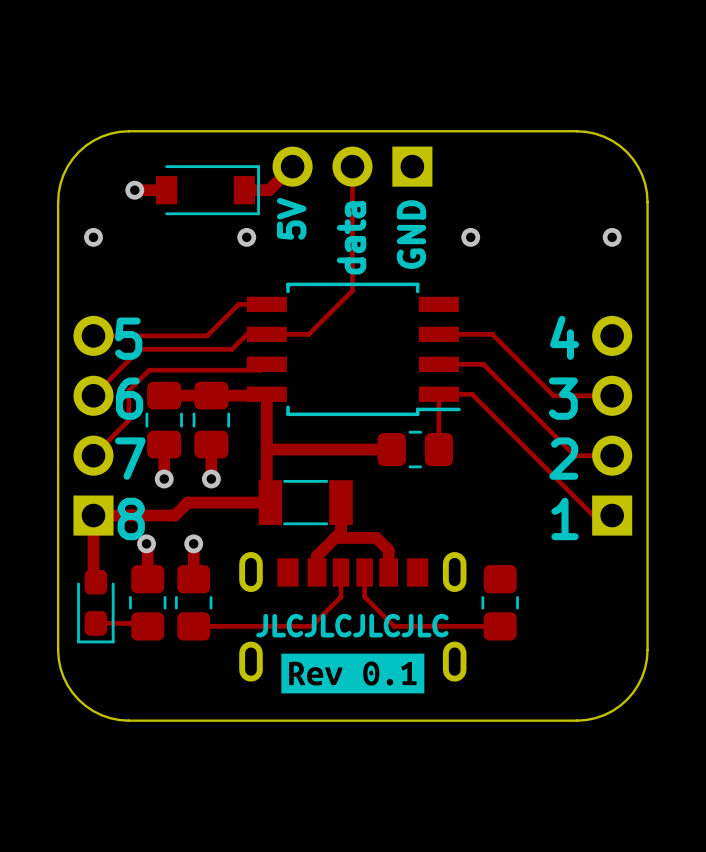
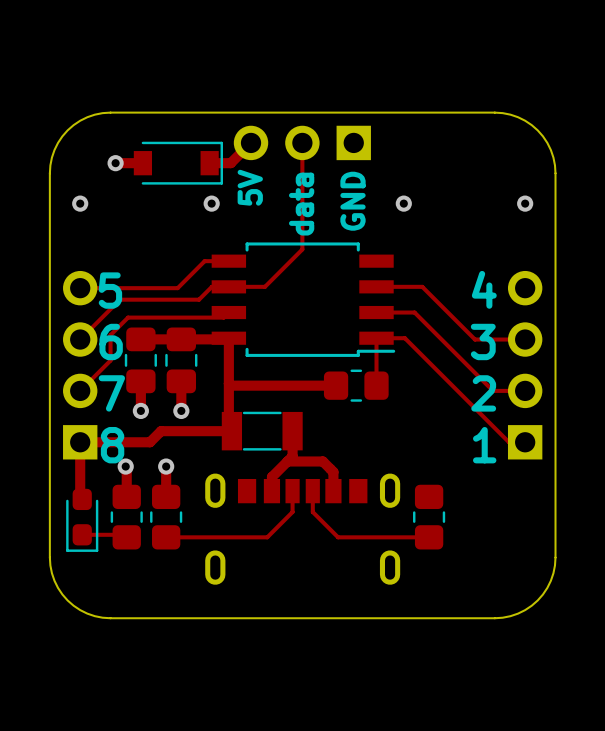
text: JLCJLCJLCJLC (352, 625) -> none
drawing: [281, 653, 425, 694] -> none

